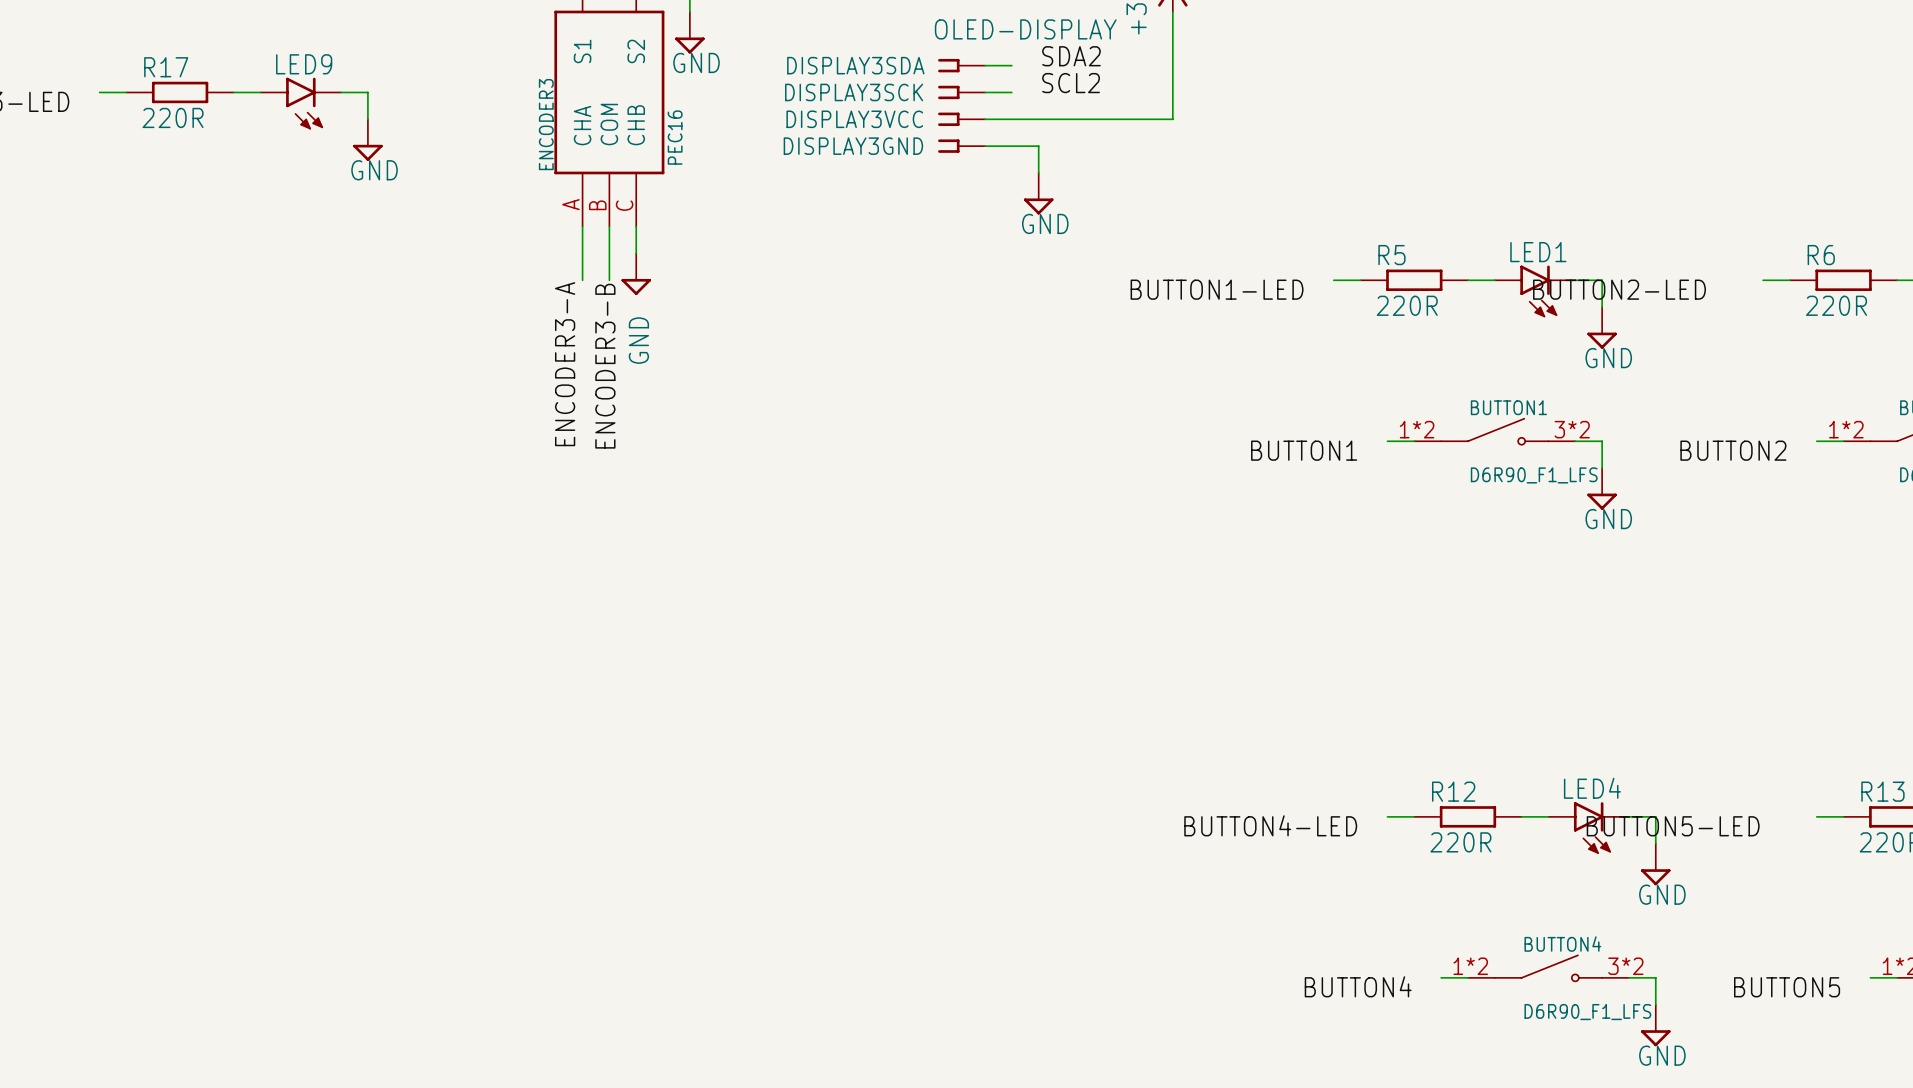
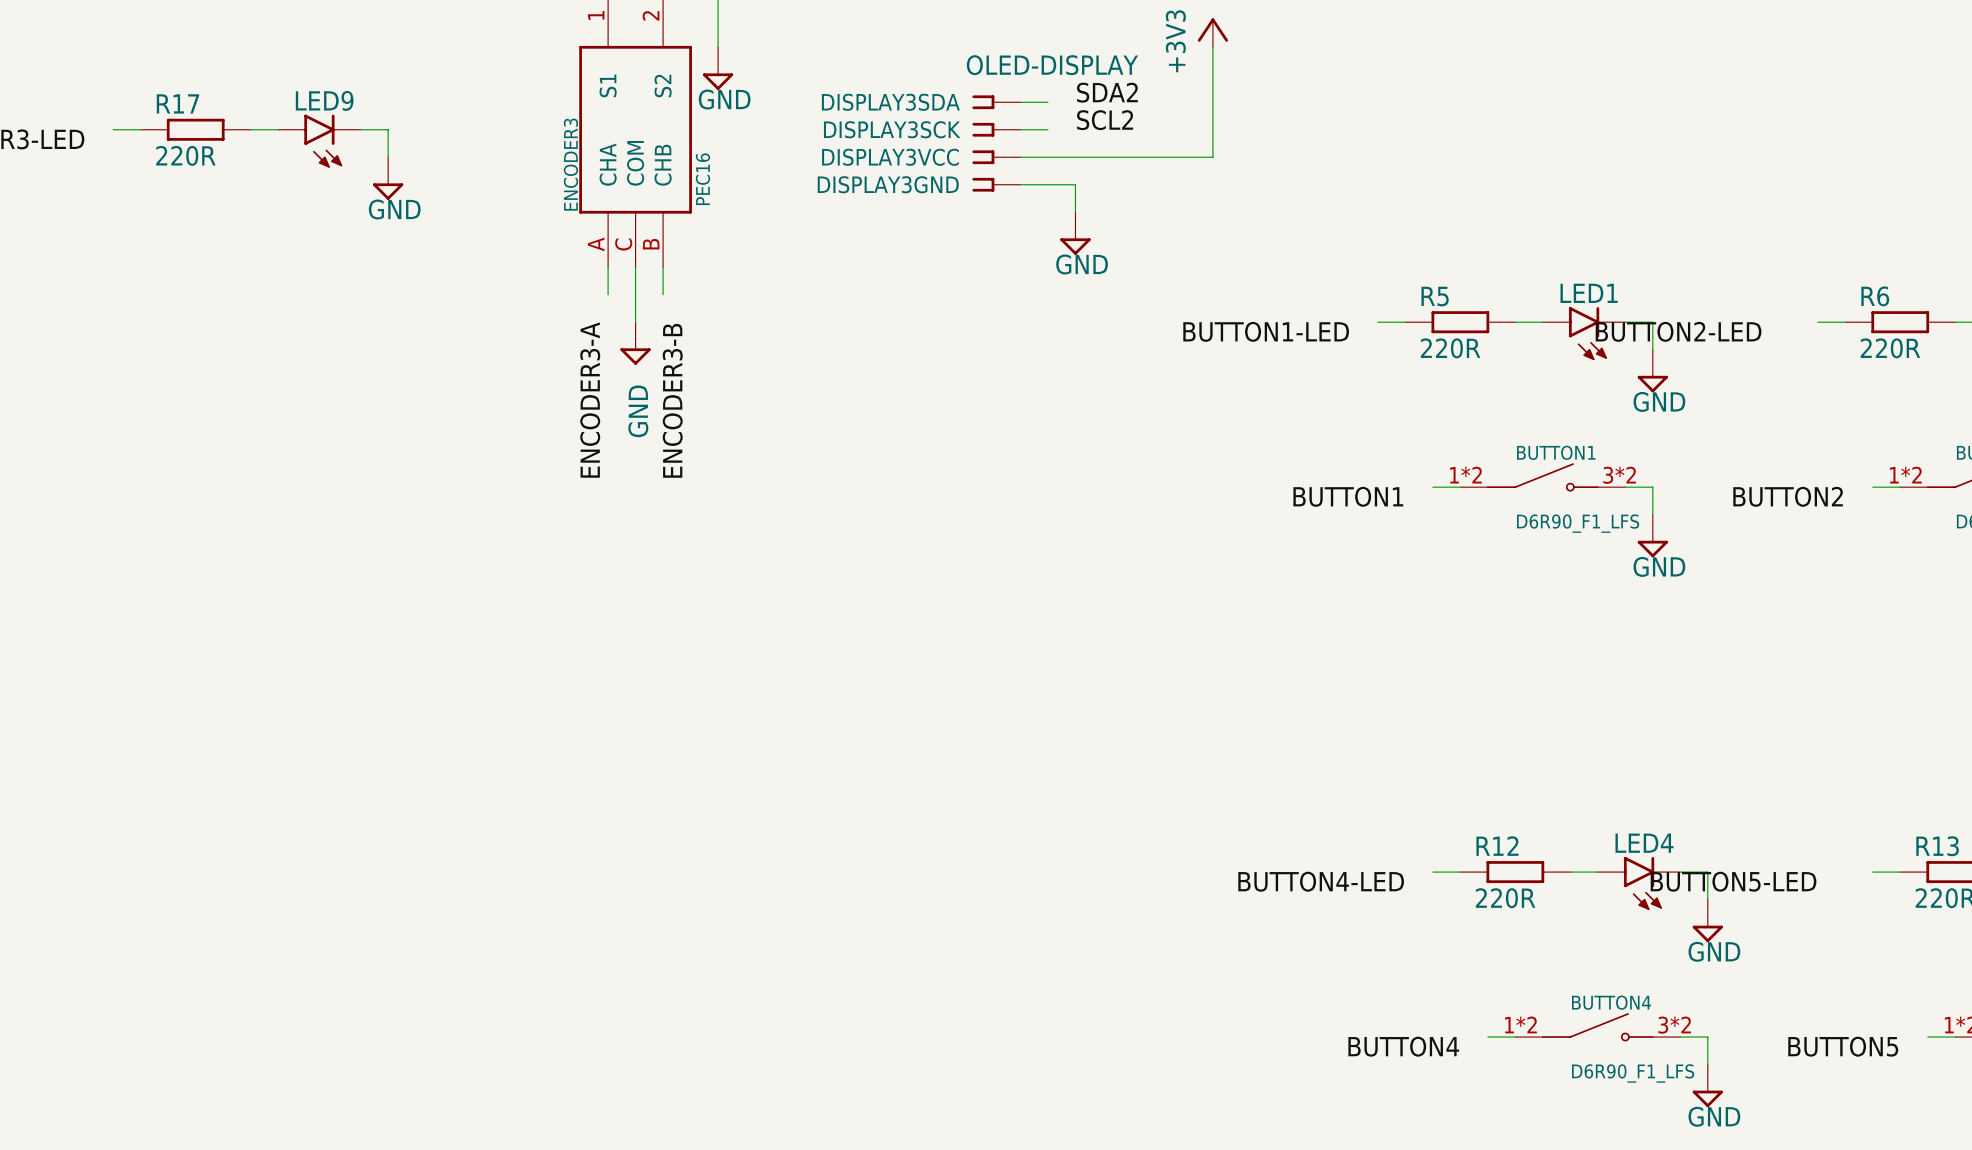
ENCODER3 pin number: B (597, 205) -> C (623, 244)
ENCODER3 pin number: C (624, 205) -> B (651, 244)
wire: (582, 253) (582, 280) -> none
power symbol position: GND (636, 274) -> GND (635, 343)
label position: ENCODER3-B (605, 366) -> ENCODER3-B (672, 400)

